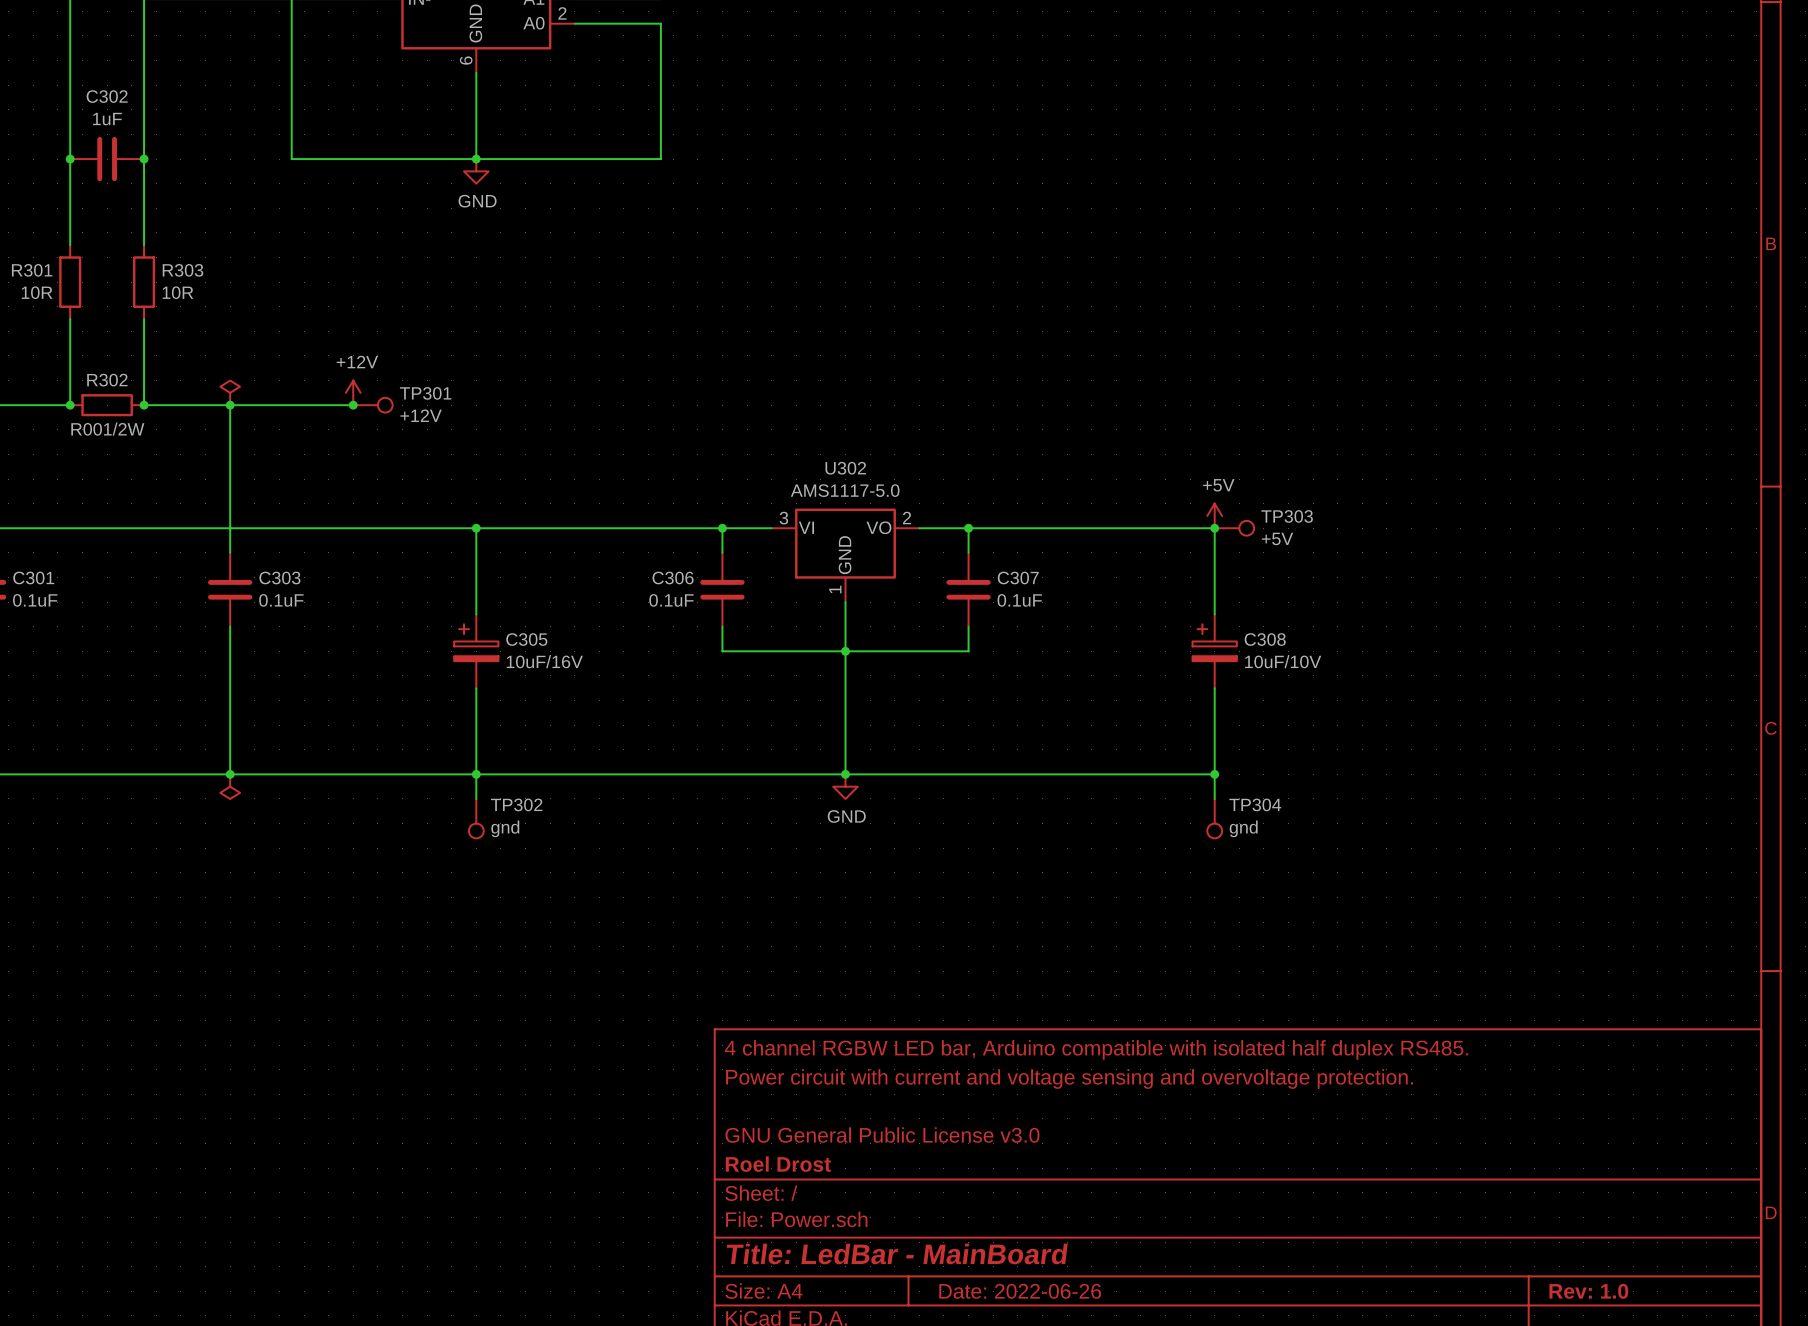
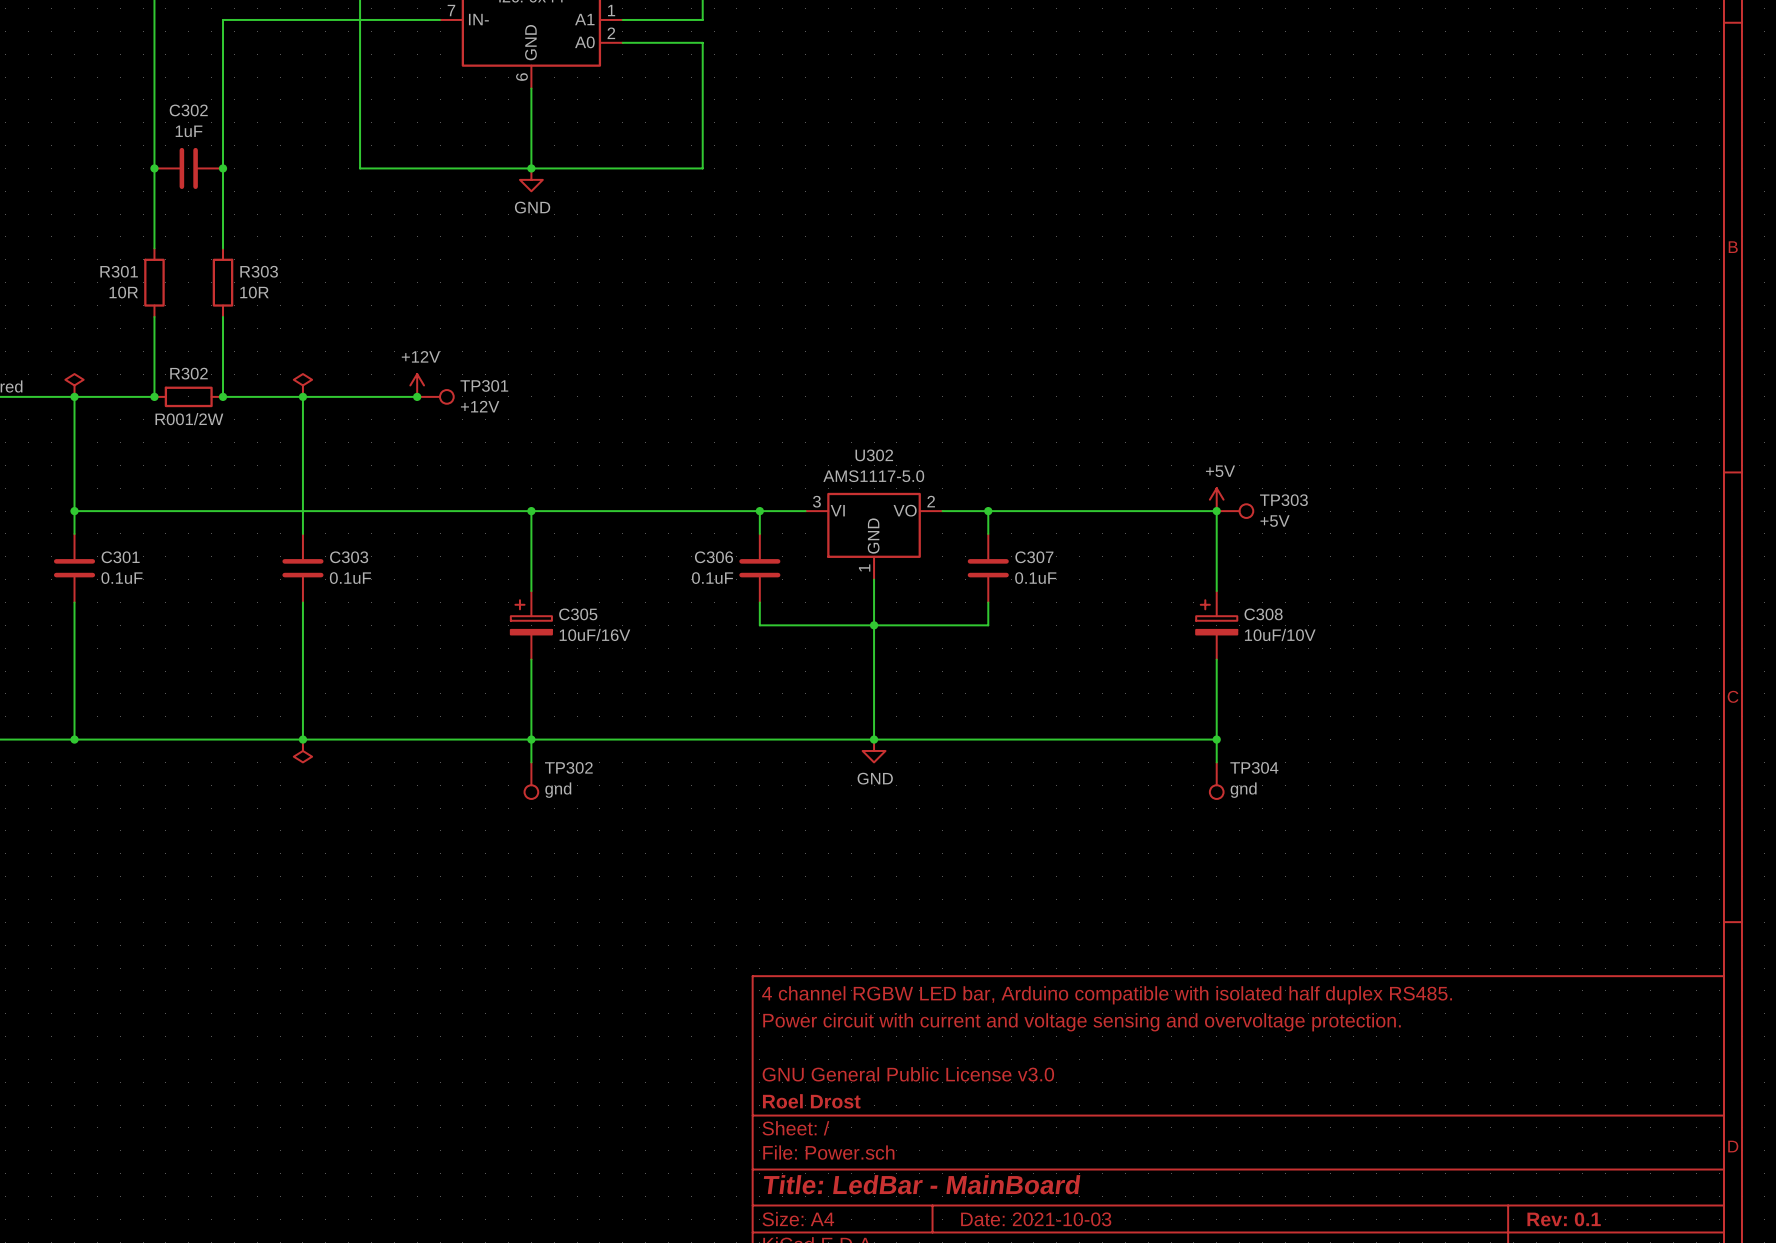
title block: Date: 2022-06-26 (1020, 1291) -> Date: 2021-10-03 (1036, 1219)
title block: Rev: 1.0 (1588, 1291) -> Rev: 0.1 (1564, 1219)

